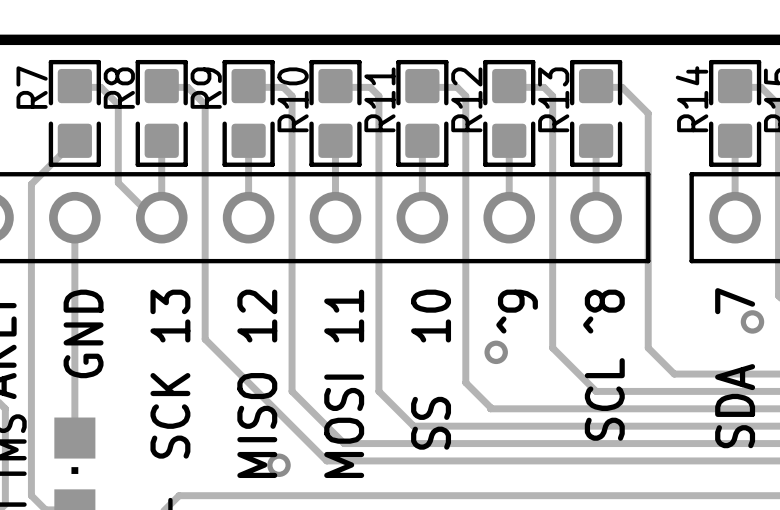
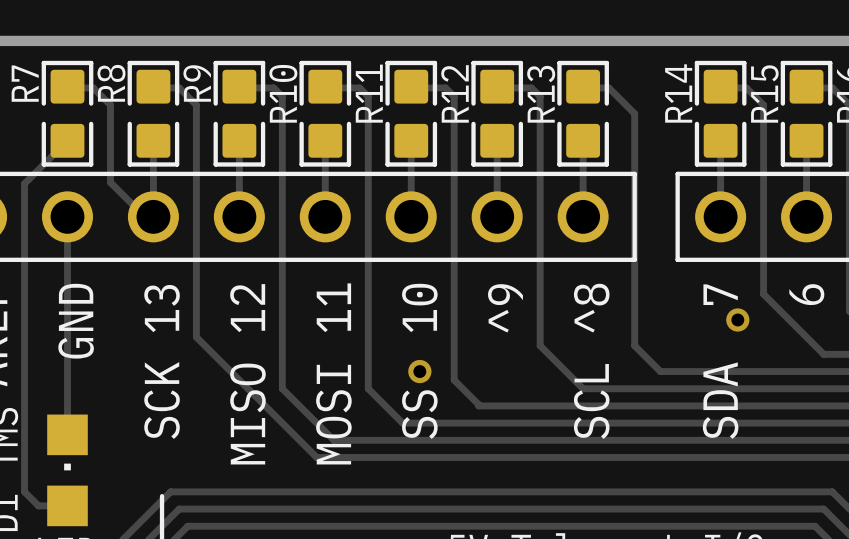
via position: (496, 352) -> (419, 371)
via: (279, 465) -> none

